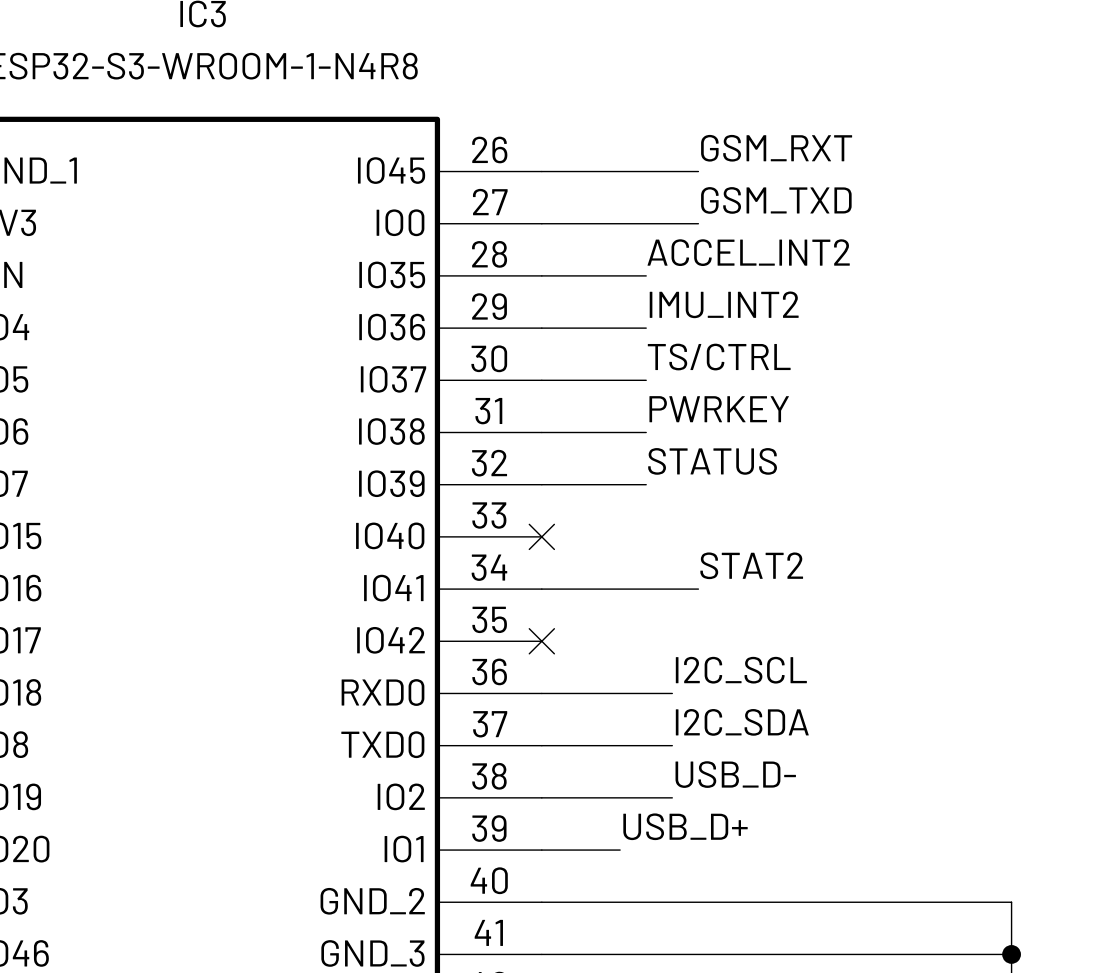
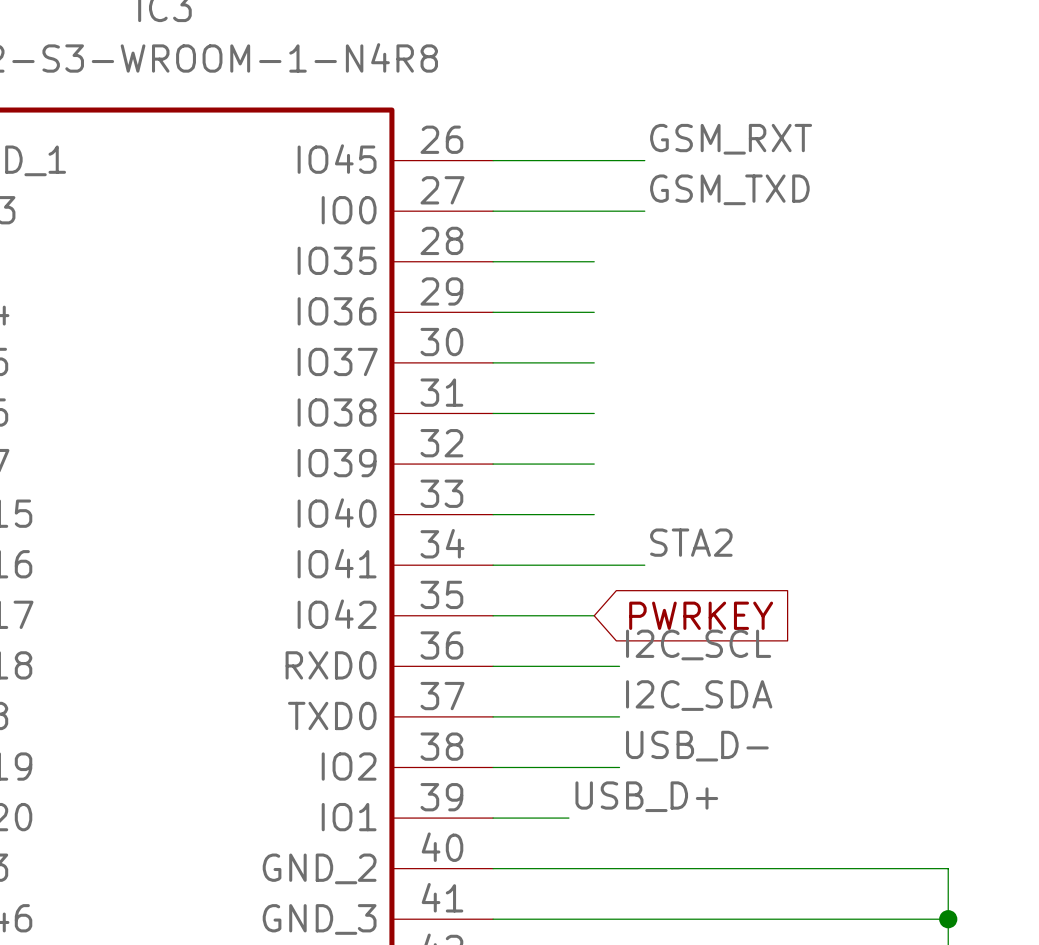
label: ACCEL_INT2 (748, 252) -> none
label: IMU_INT2 (724, 304) -> none
label: TS/CTRL (719, 357) -> none
label: PWRKEY (719, 409) -> none
label: STATUS (712, 461) -> none
wire: none -> (493, 514) (594, 514)
no-connect mark: (541, 536) -> none
label: STAT2 (751, 565) -> STA2 (691, 542)
wire: none -> (493, 615) (594, 615)
no-connect mark: (541, 641) -> none
global label: none -> PWRKEY (701, 615)

